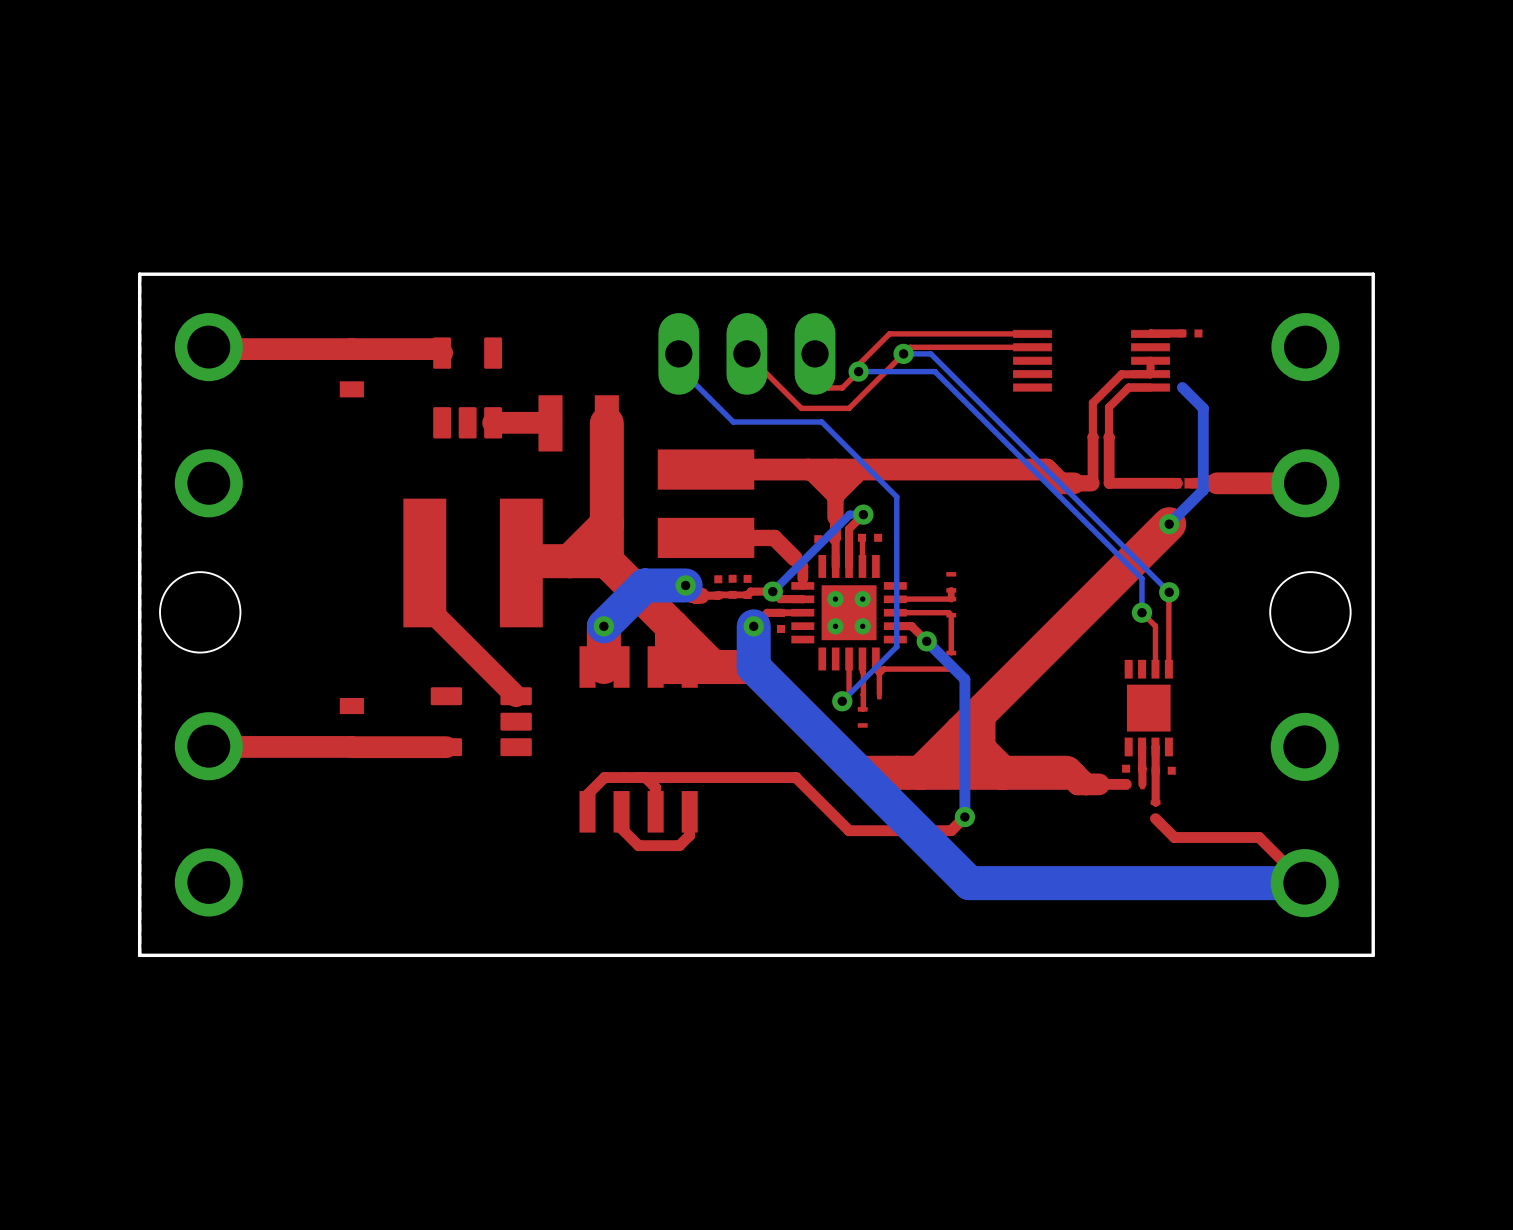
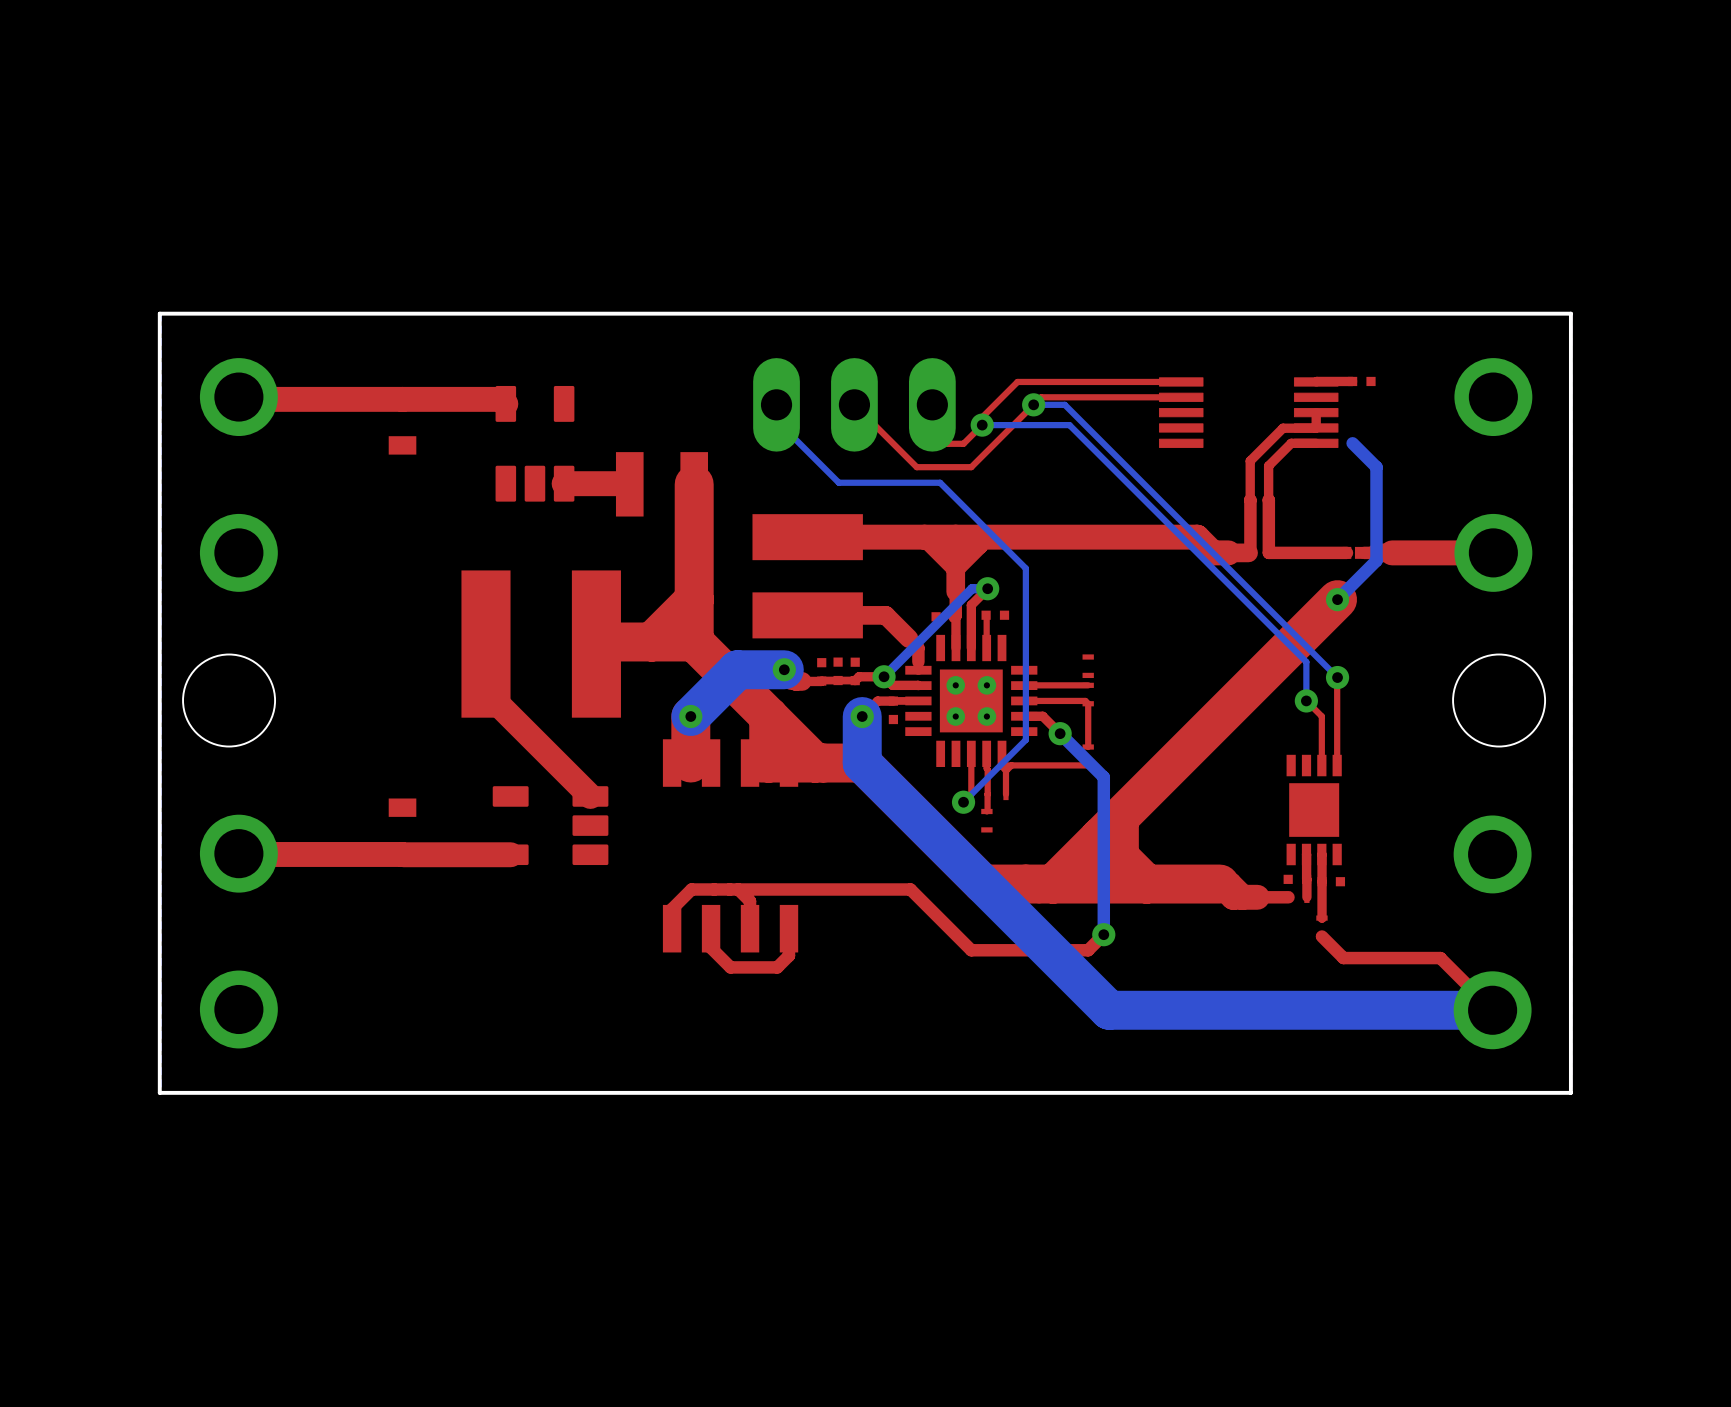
top track: (951, 590) (951, 599) -> none

